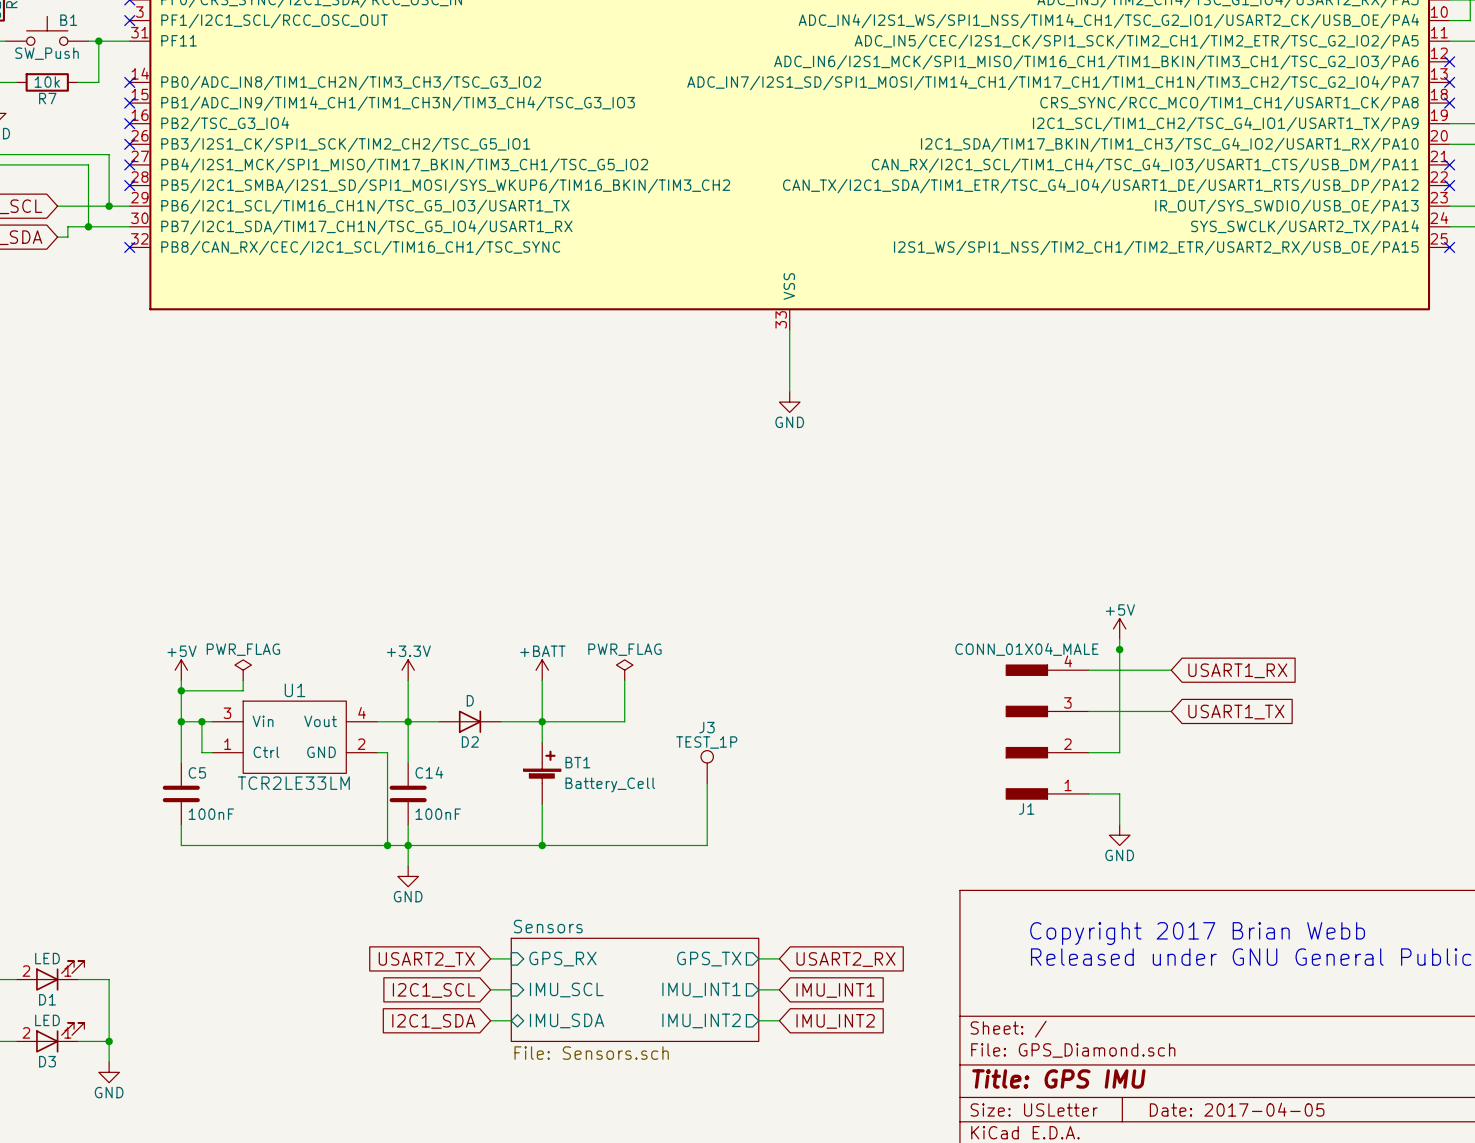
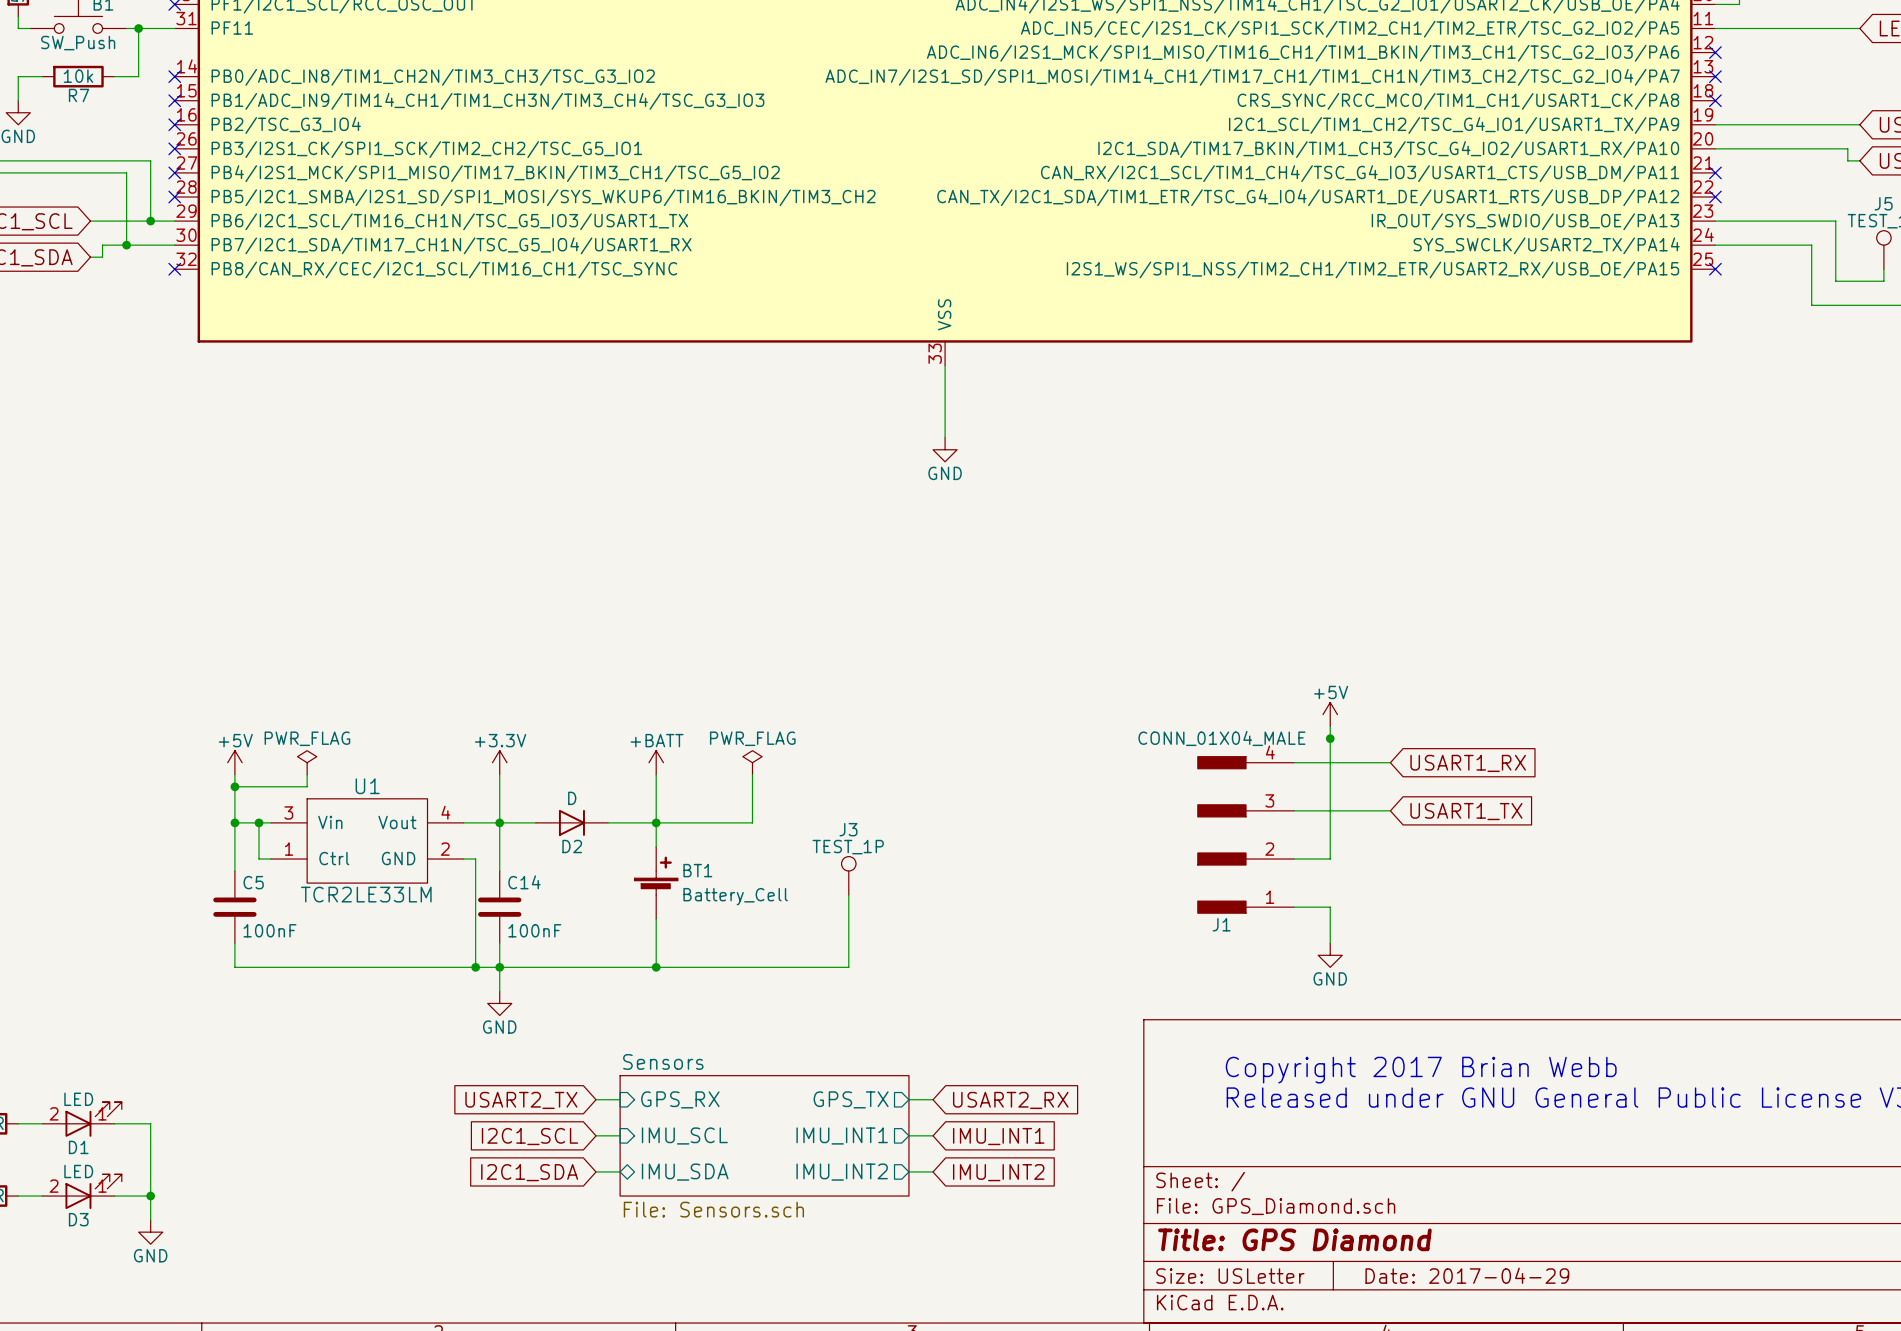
title block: Title: GPS IMU (1058, 1078) -> Title: GPS Diamond (1294, 1239)
title block: Date: 2017-04-05 (1237, 1109) -> Date: 2017-04-29 (1467, 1275)

